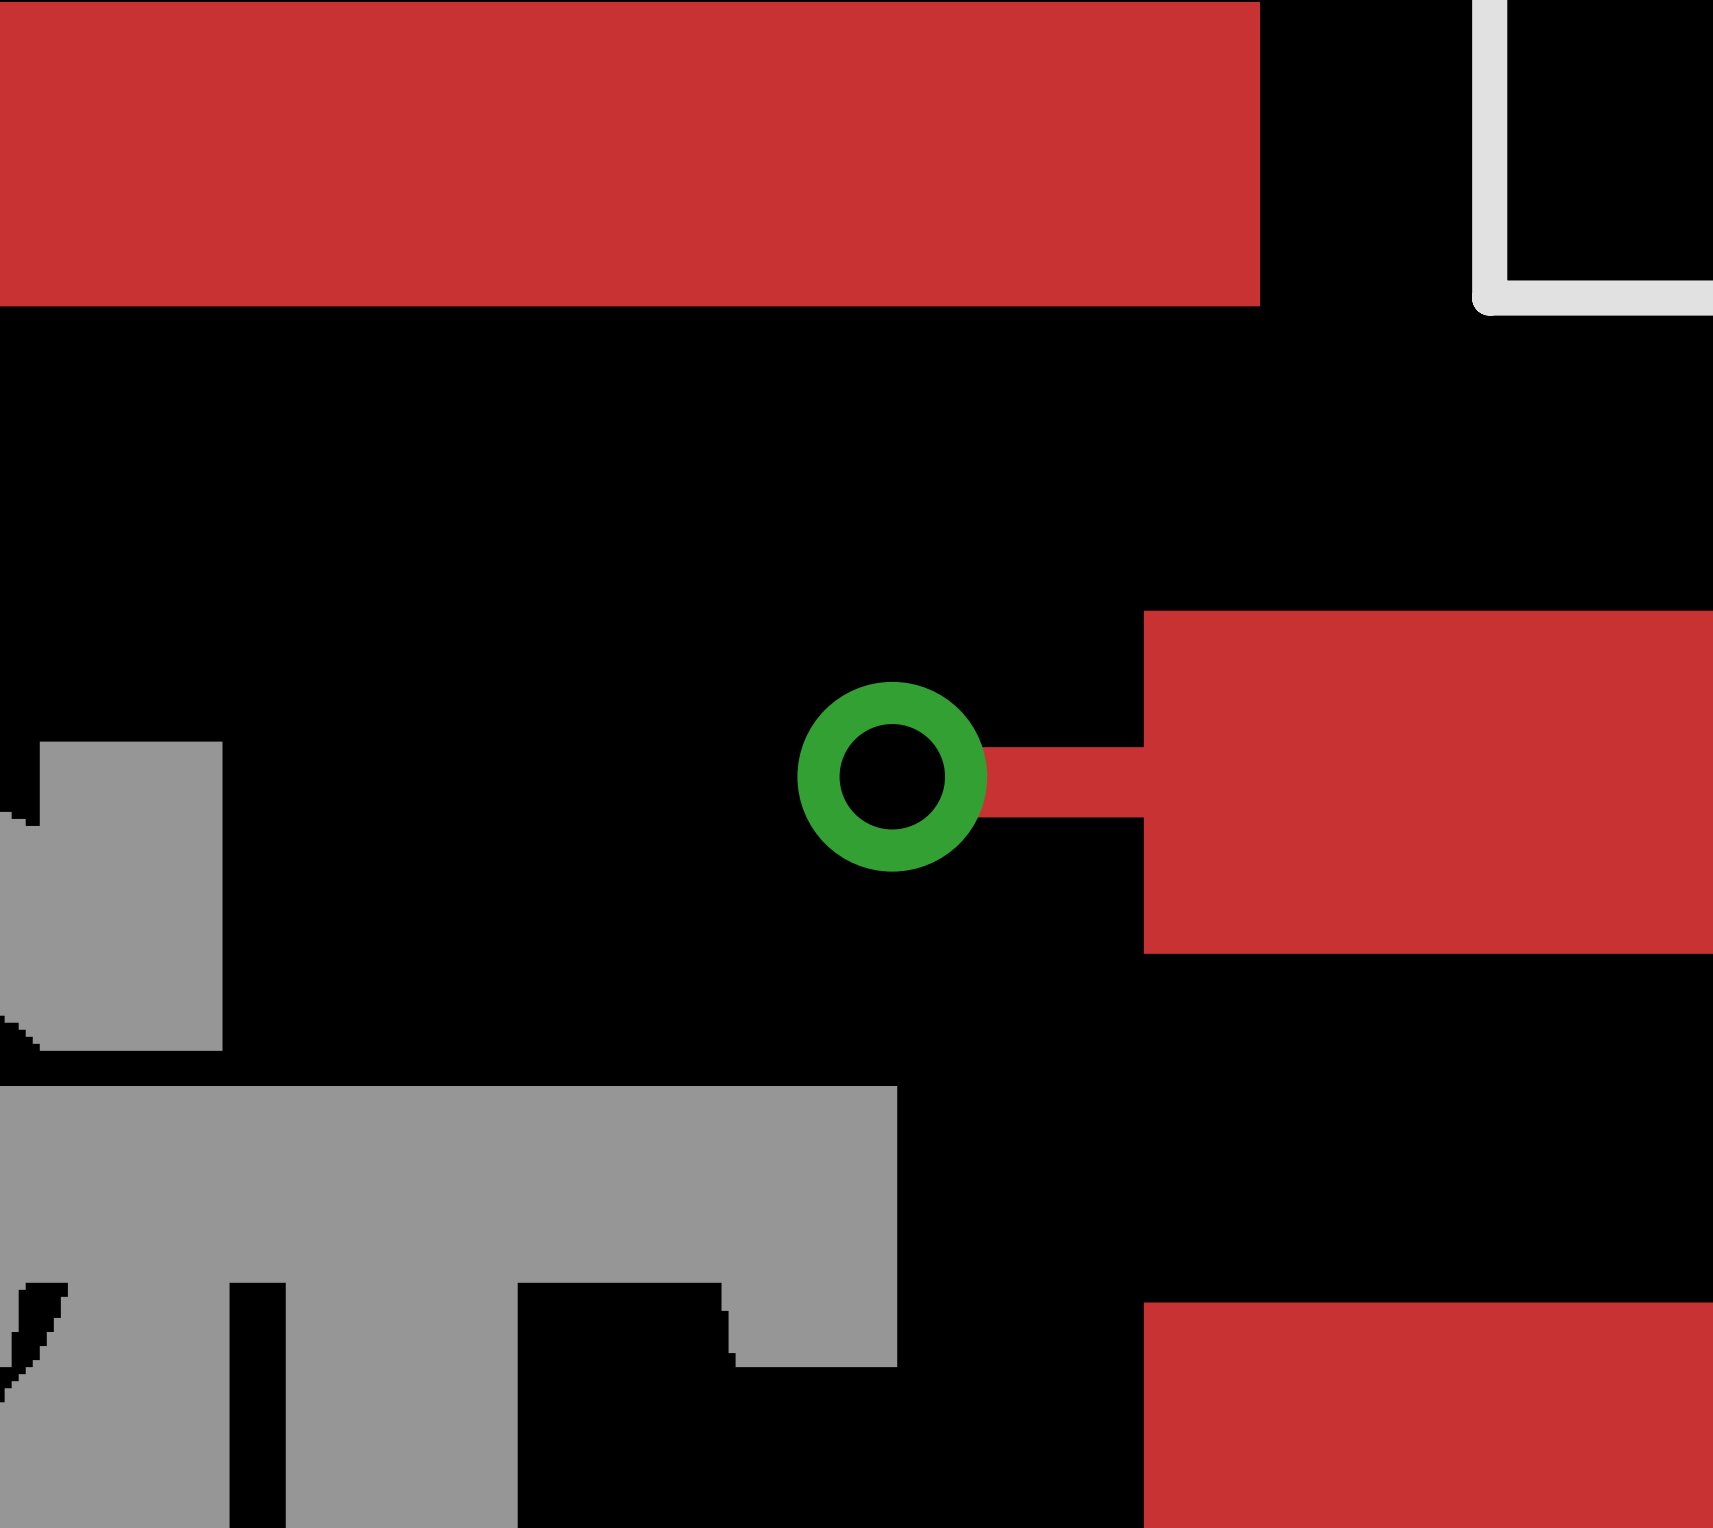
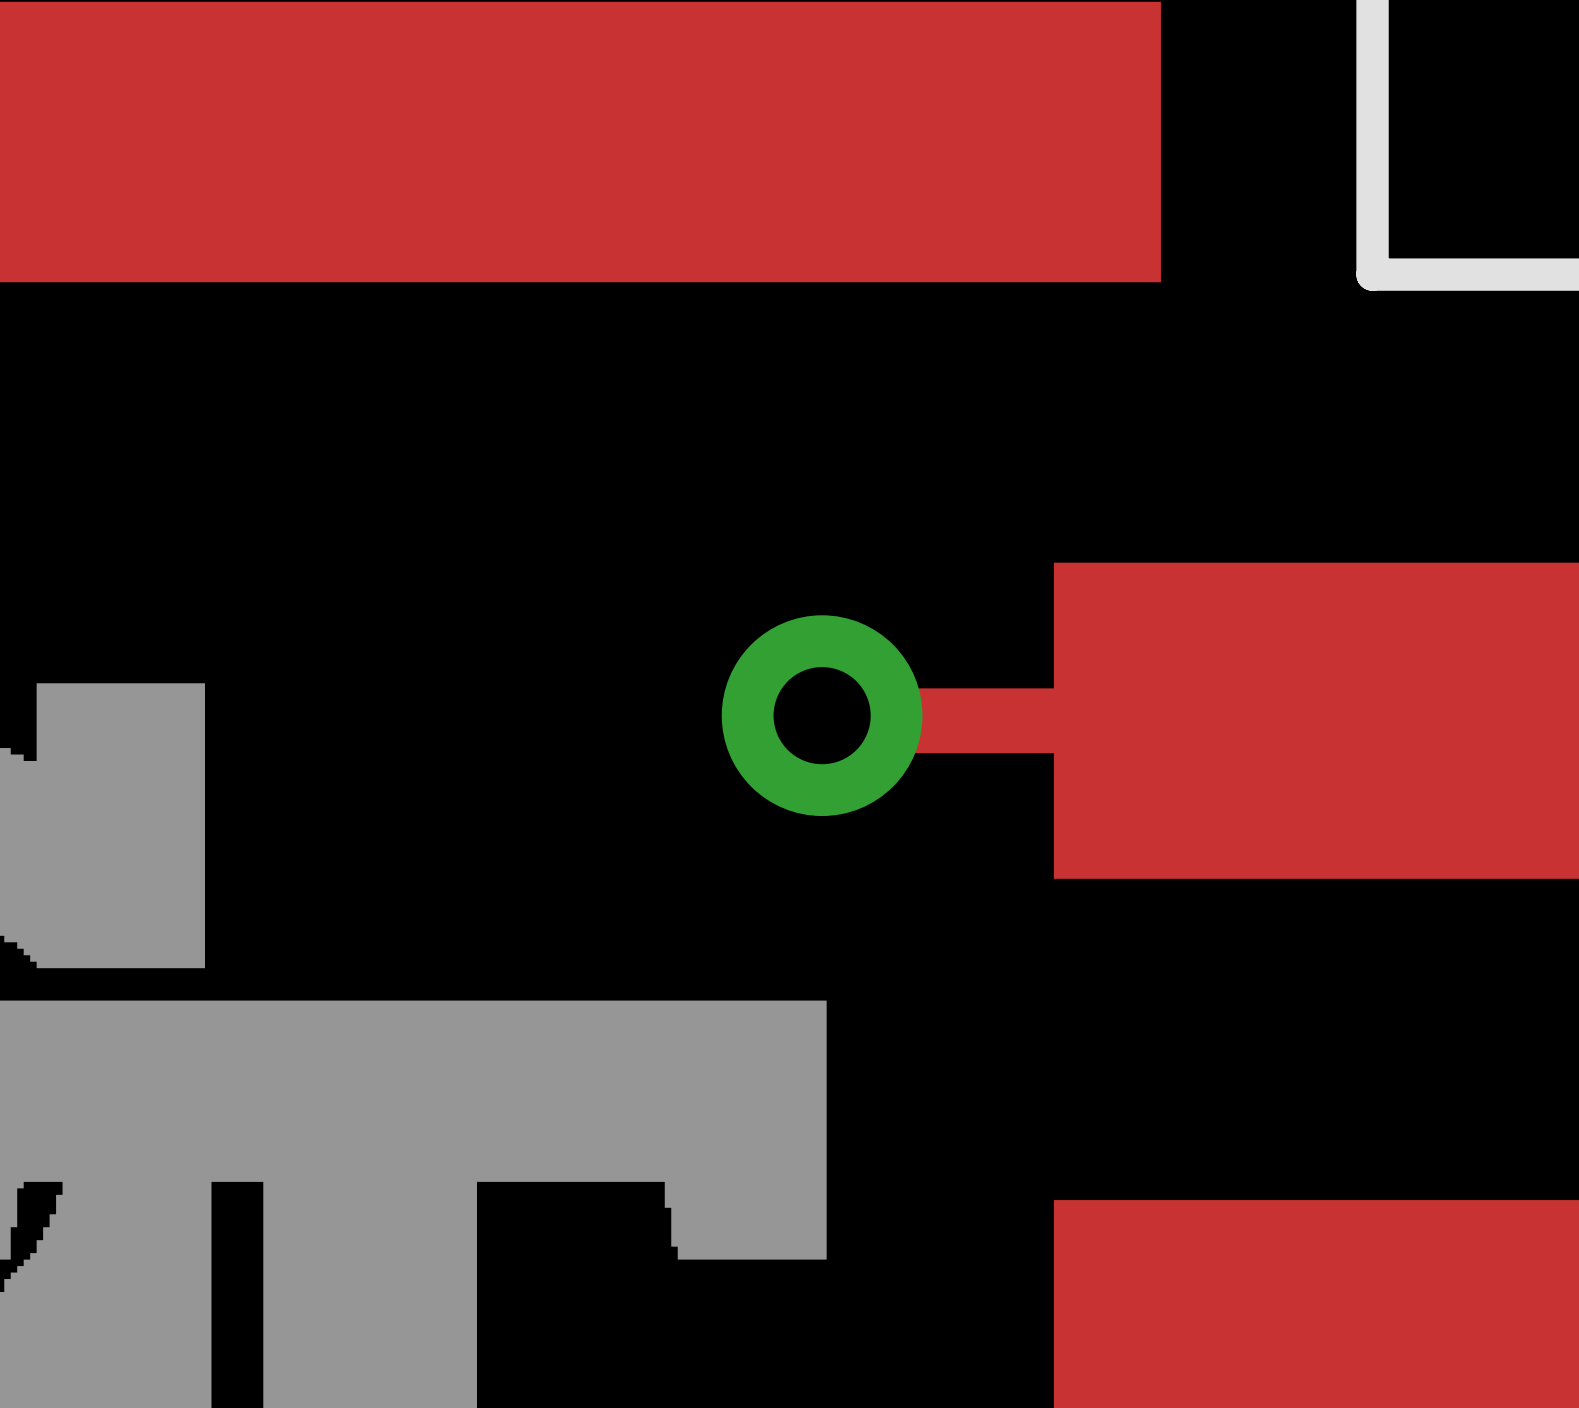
via size: [797, 681, 988, 872] -> [721, 615, 923, 817]

